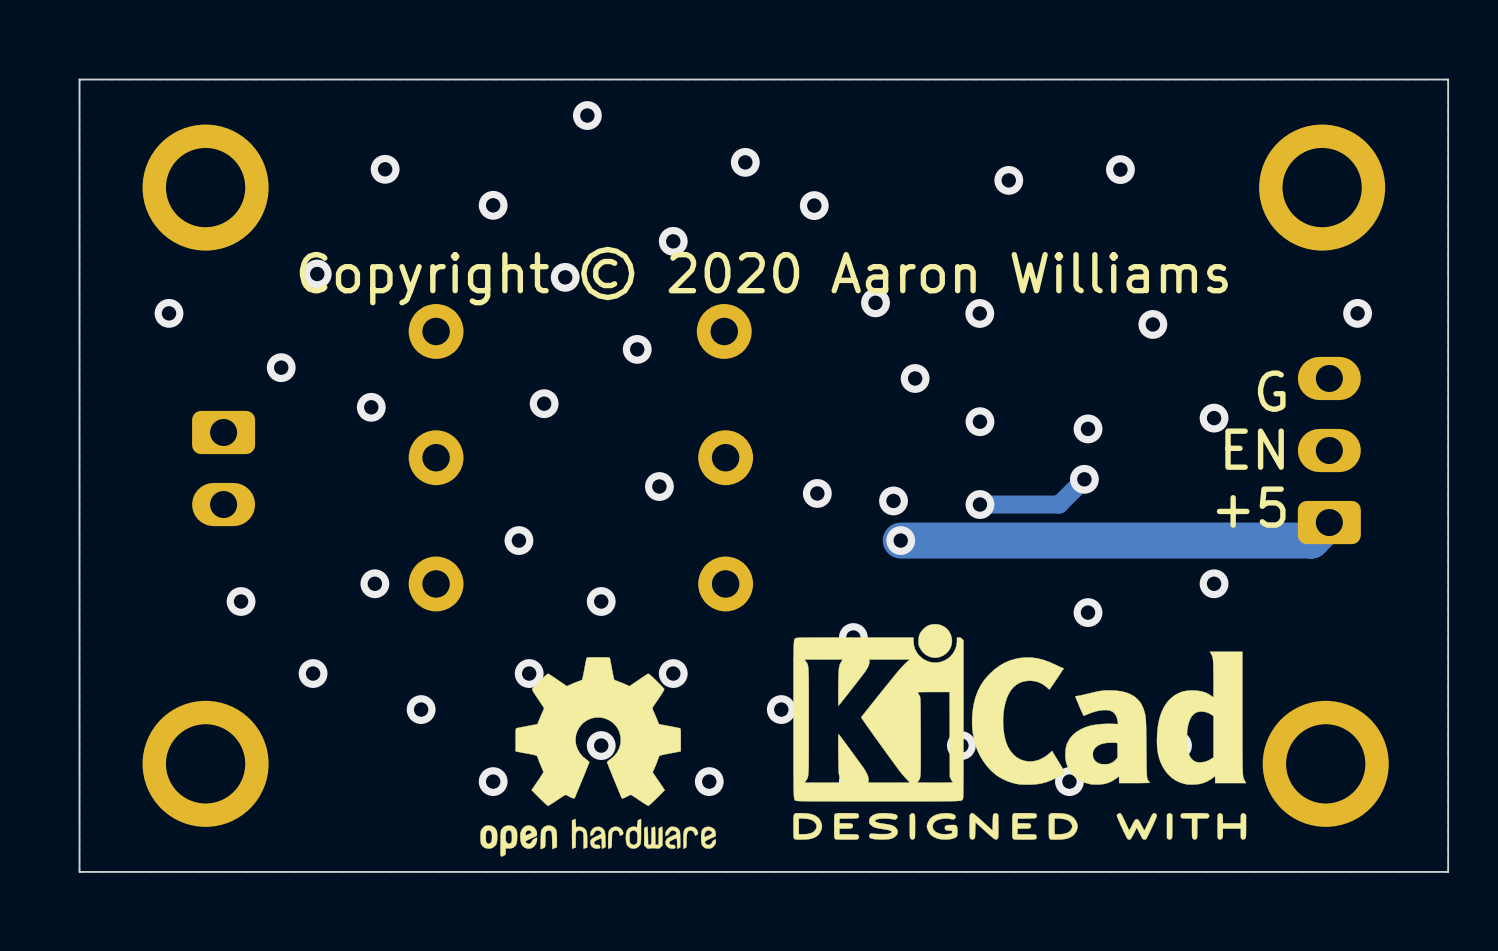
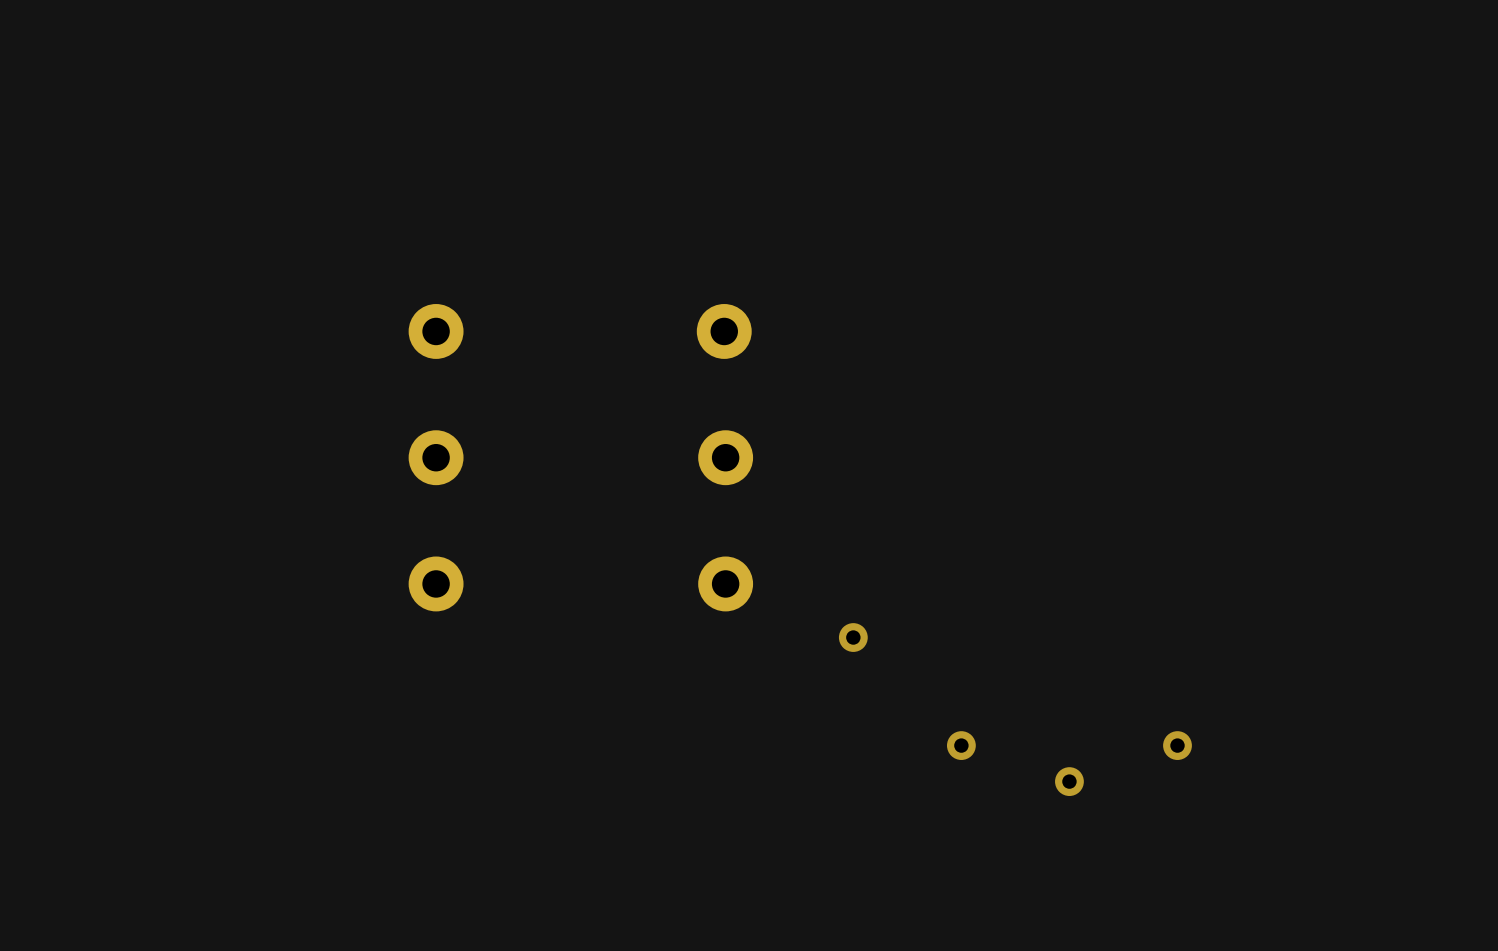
board edge: (1448, 79) (79, 79) (79, 871) (1448, 871) (1448, 79) -> none
via: (587, 115) -> none
via: (745, 162) -> none
via: (385, 169) -> none
via: (1120, 169) -> none
via: (1008, 180) -> none
part: (205, 187) -> none
part: (1322, 187) -> none
via: (493, 205) -> none
via: (814, 205) -> none
via: (673, 241) -> none
via: (317, 274) -> none
text: Copyright © 2020 Aaron Williams (763, 276) -> none
via: (565, 277) -> none
via: (875, 302) -> none
via: (169, 313) -> none
via: (979, 313) -> none
via: (1357, 313) -> none
via: (1152, 324) -> none
via: (637, 349) -> none
via: (281, 367) -> none
via: (915, 378) -> none
text: G (1271, 391) -> none
via: (544, 403) -> none
via: (371, 407) -> none
via: (1214, 418) -> none
via: (979, 421) -> none
via: (1088, 428) -> none
text: EN (1254, 449) -> none
part: (1329, 450) -> none
part: (223, 468) -> none
track: (1084, 479) (1059, 504) (979, 504) -> none
via: (1084, 479) -> none
via: (659, 486) -> none
via: (817, 493) -> none
via: (893, 500) -> none
via: (979, 504) -> none
text: +5 (1251, 507) -> none
track: (1329, 522) (1311, 540) (900, 540) -> none
via: (518, 540) -> none
via: (900, 540) -> none
via: (374, 583) -> none
via: (1214, 583) -> none
via: (241, 601) -> none
via: (601, 601) -> none
via: (1088, 612) -> none
drawing: [793, 624, 1247, 840] -> none
drawing: [480, 657, 716, 857] -> none
via: (313, 673) -> none
via: (529, 673) -> none
via: (673, 673) -> none
via: (421, 709) -> none
via: (781, 709) -> none
via: (601, 745) -> none
part: (205, 763) -> none
part: (1325, 763) -> none
via: (493, 781) -> none
via: (709, 781) -> none

